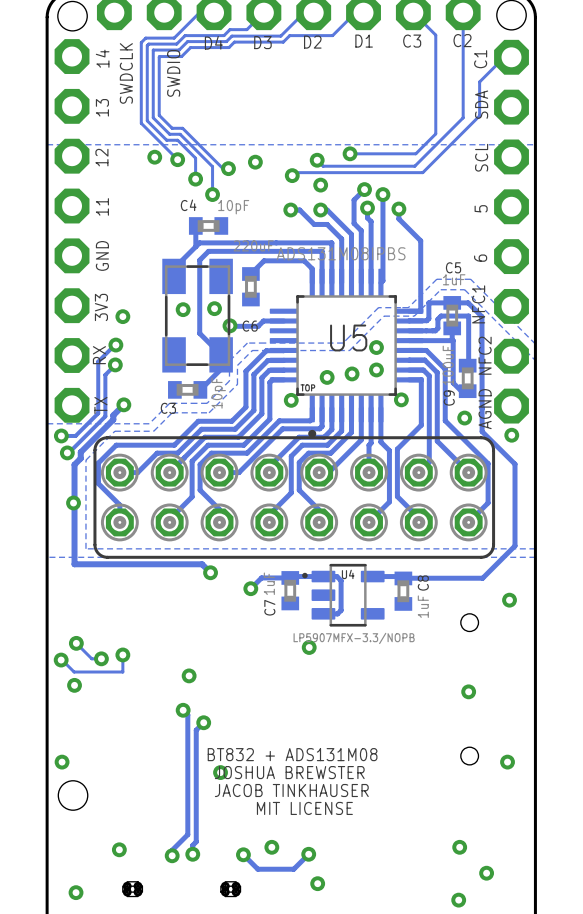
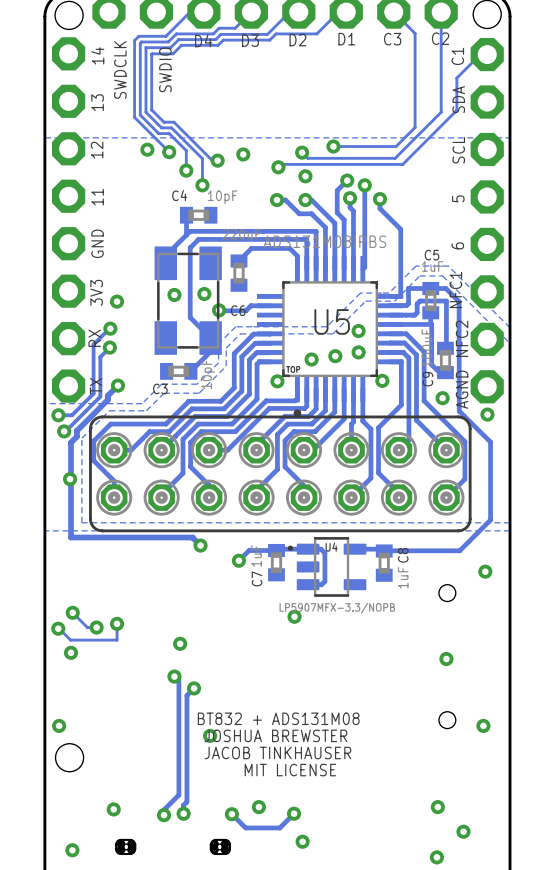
board edge: none -> (130, 839) (117, 841) (117, 852) (133, 852) (134, 843) (130, 839)
board edge: none -> (225, 839) (212, 841) (212, 852) (228, 852) (229, 843) (225, 839)

